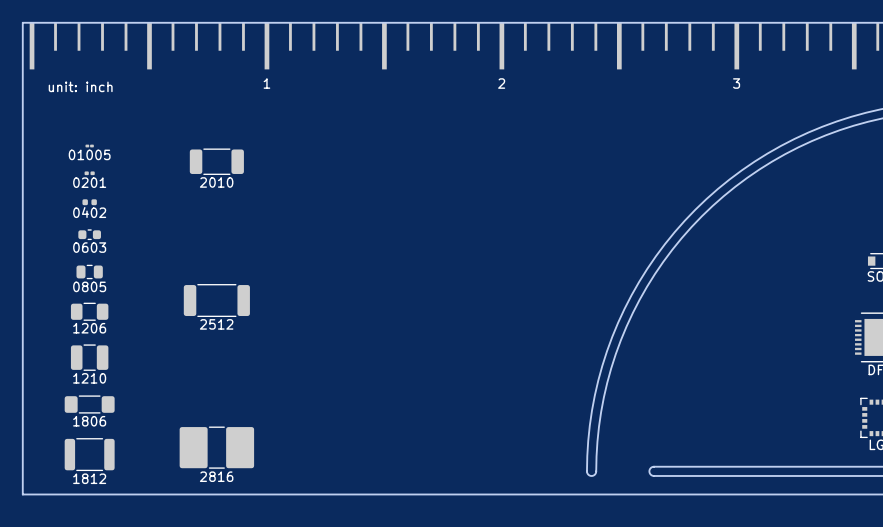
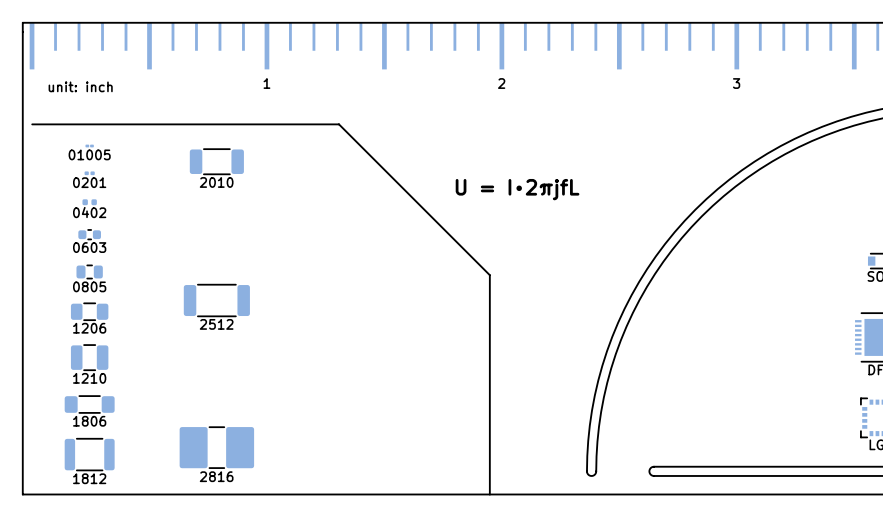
line: none -> (32, 124) (339, 124) (489, 275) (489, 494)
text: none -> U = I∙2πjfL (517, 189)

